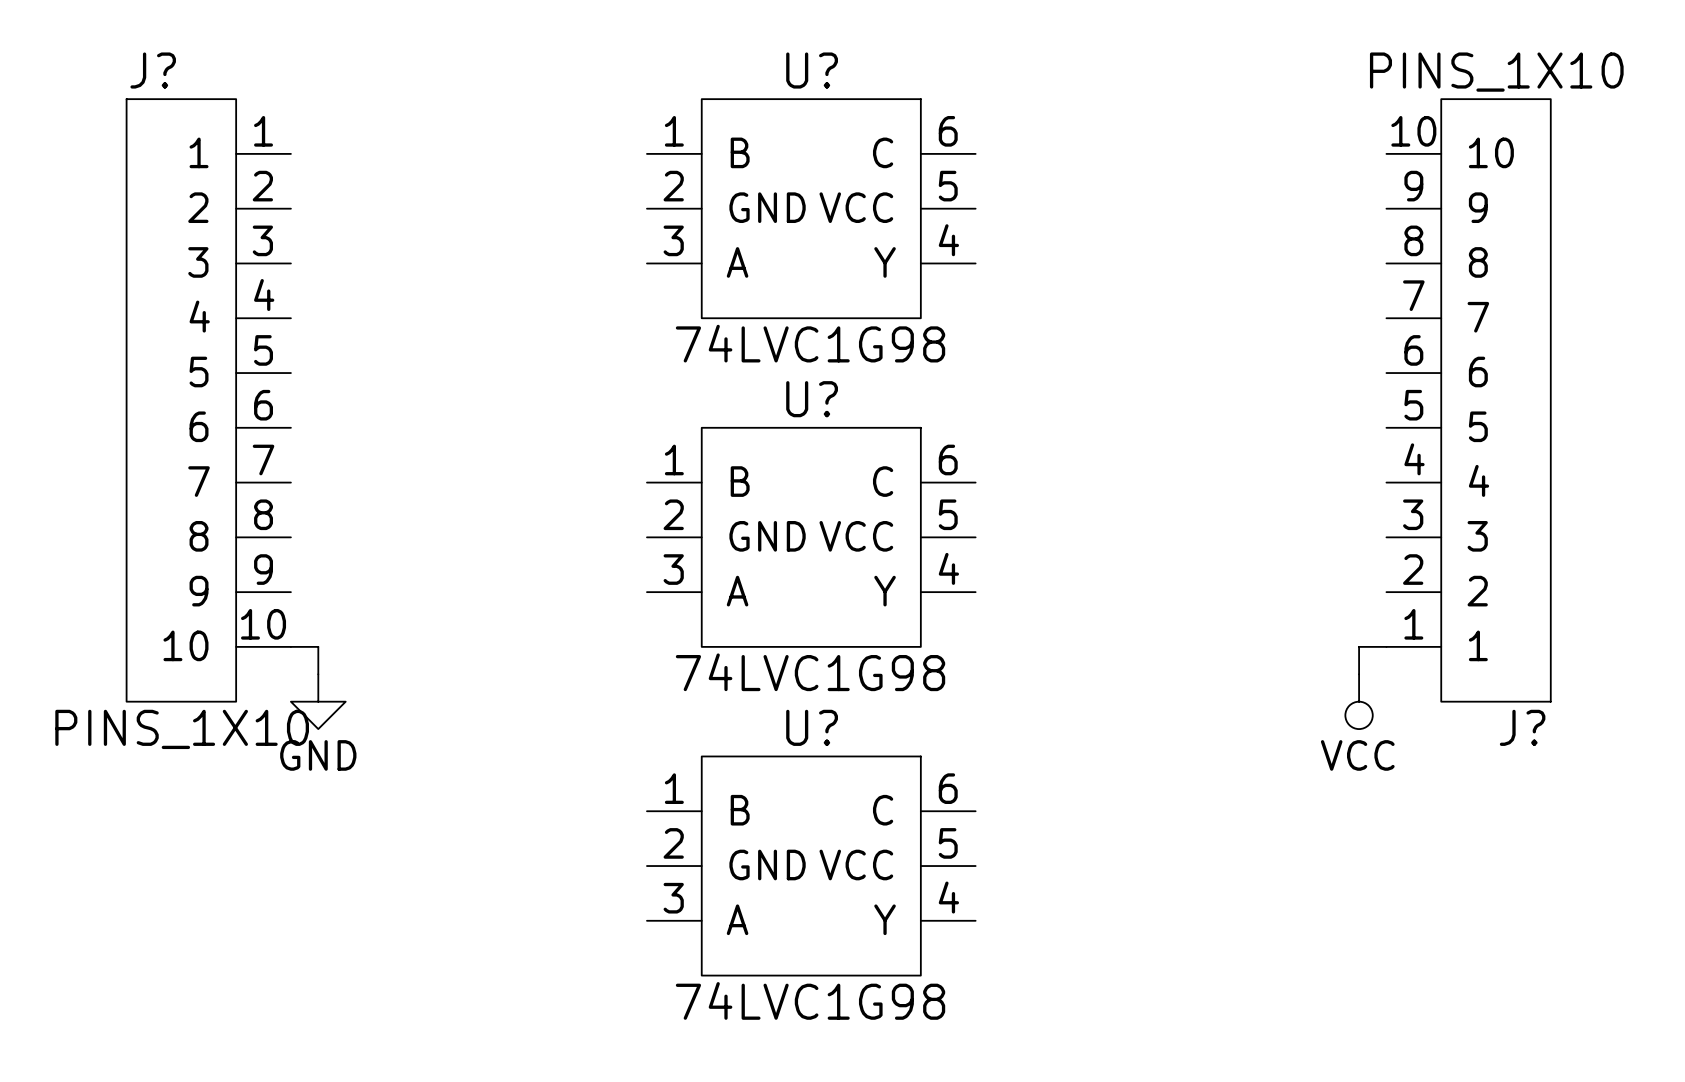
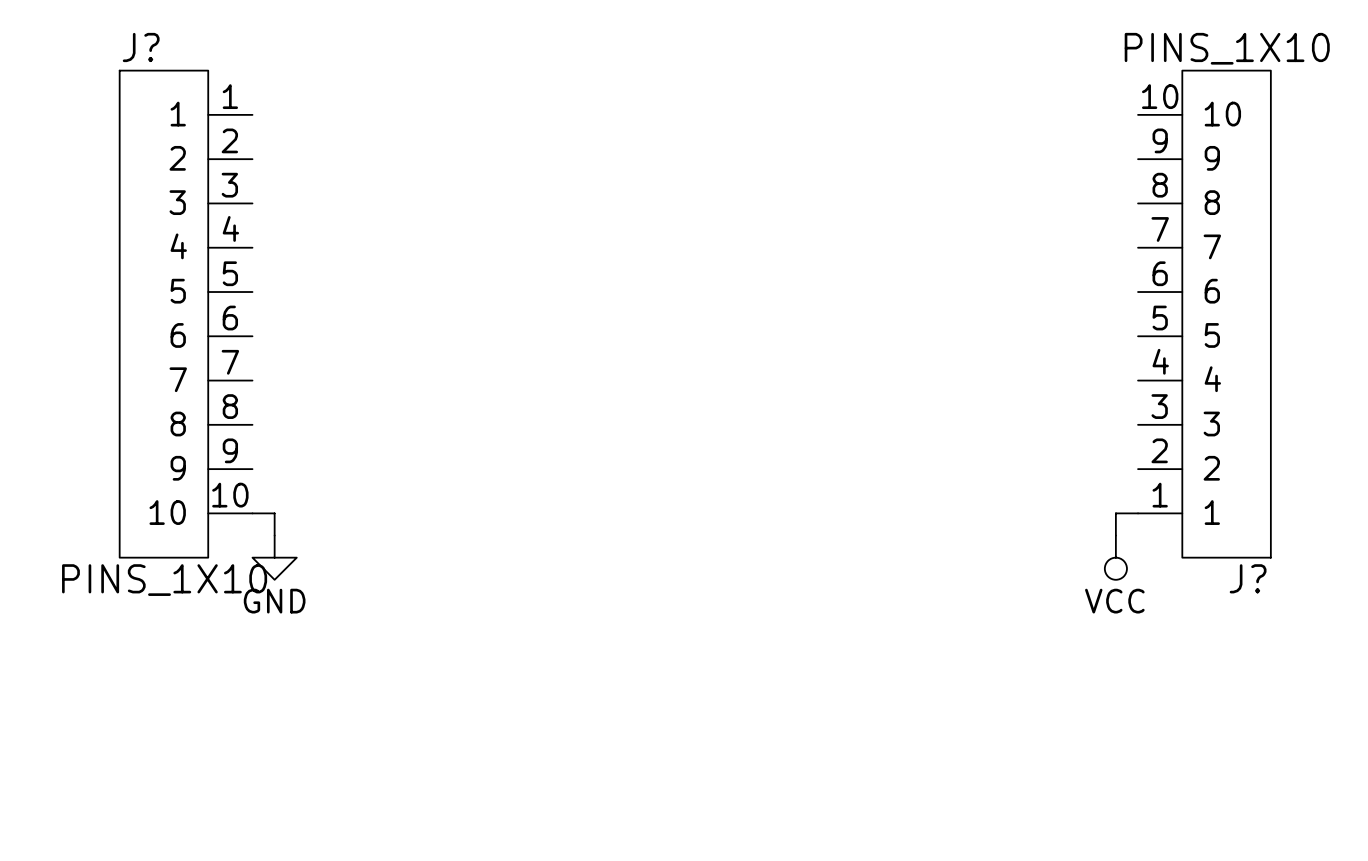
U?: 74LVC1G98 (811, 208) -> none
U?: 74LVC1G98 (811, 537) -> none
U?: 74LVC1G98 (811, 866) -> none

